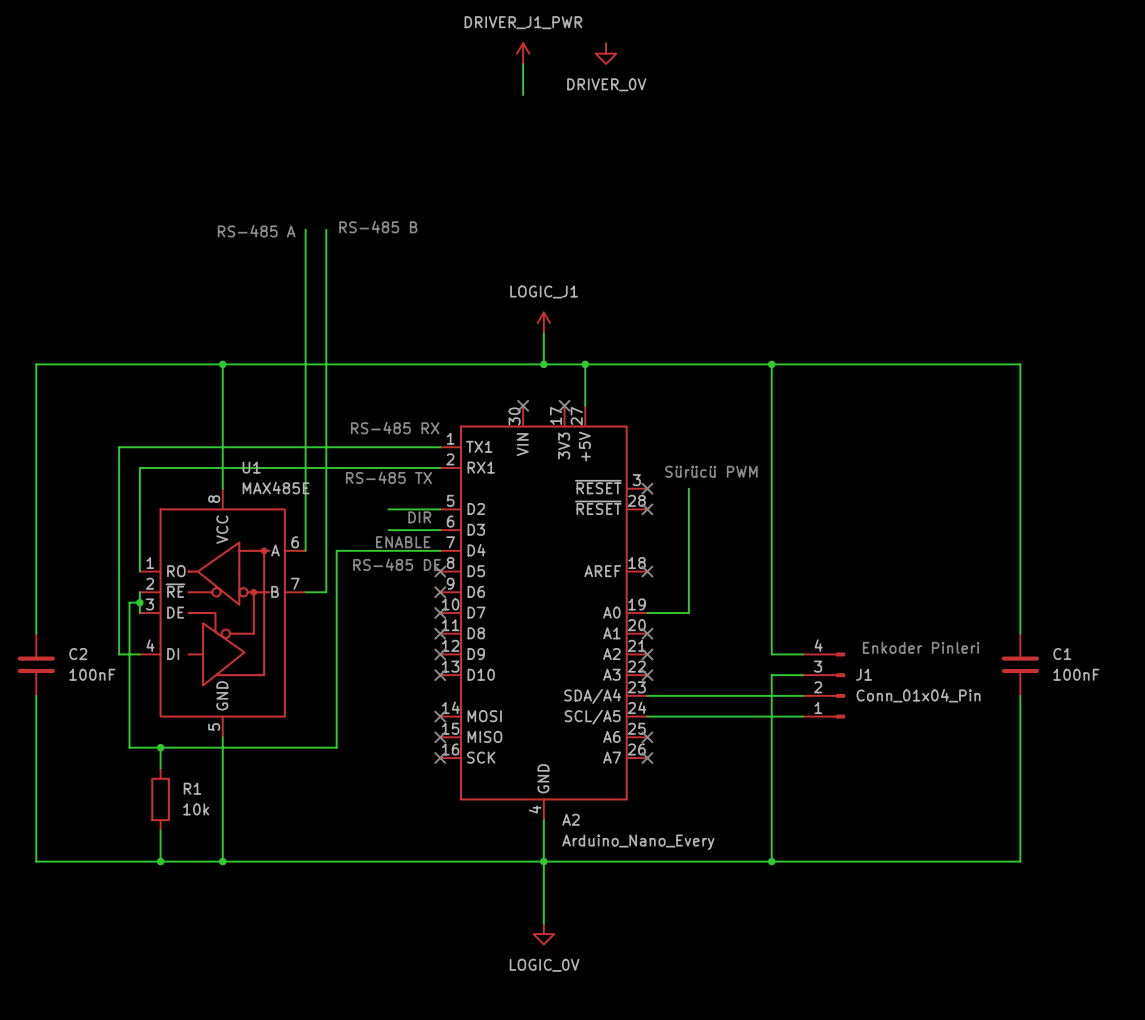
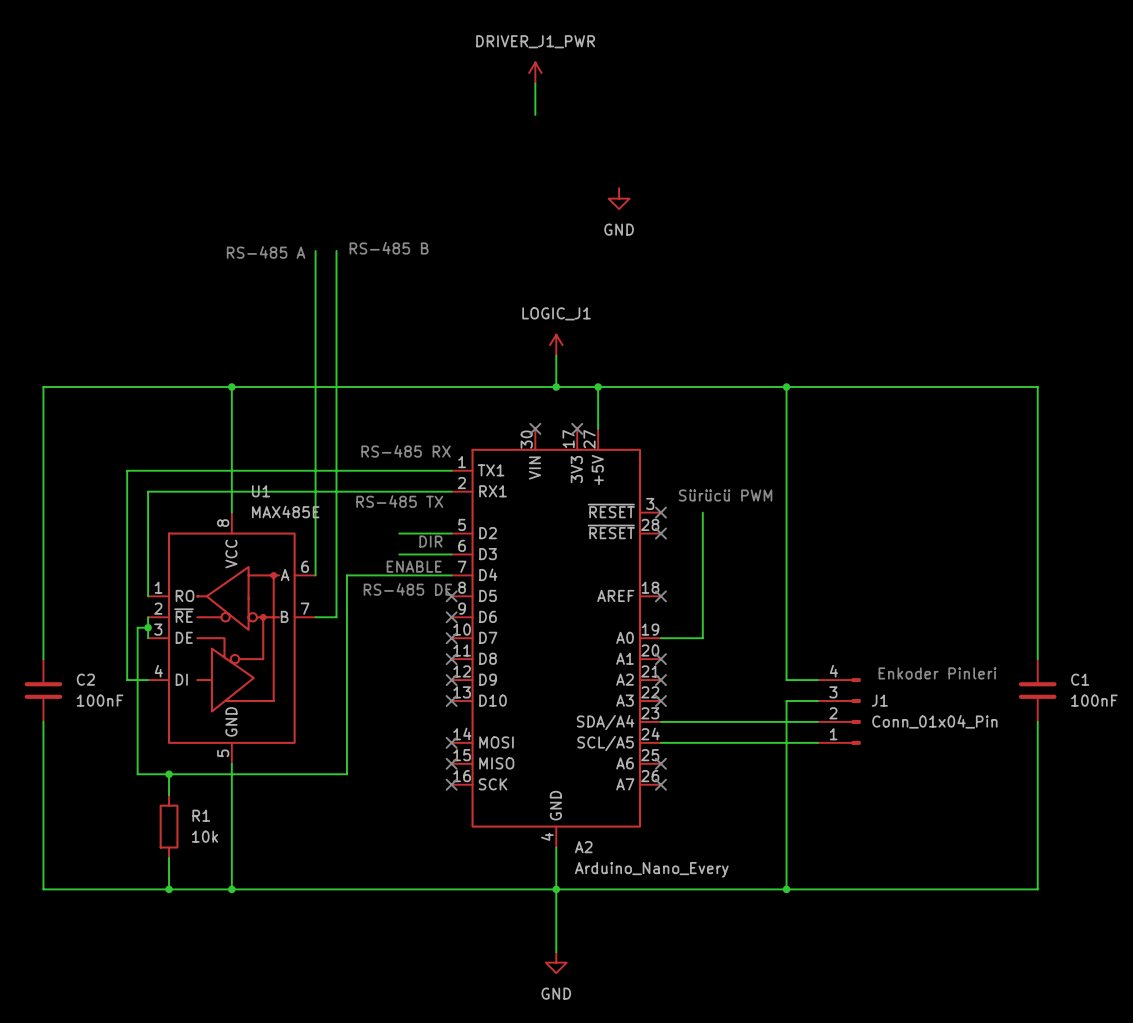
power symbol: DRIVER_0V (606, 53) -> none
power symbol: none -> GND (619, 198)
power symbol: LOGIC_0V (543, 934) -> GND (556, 962)

